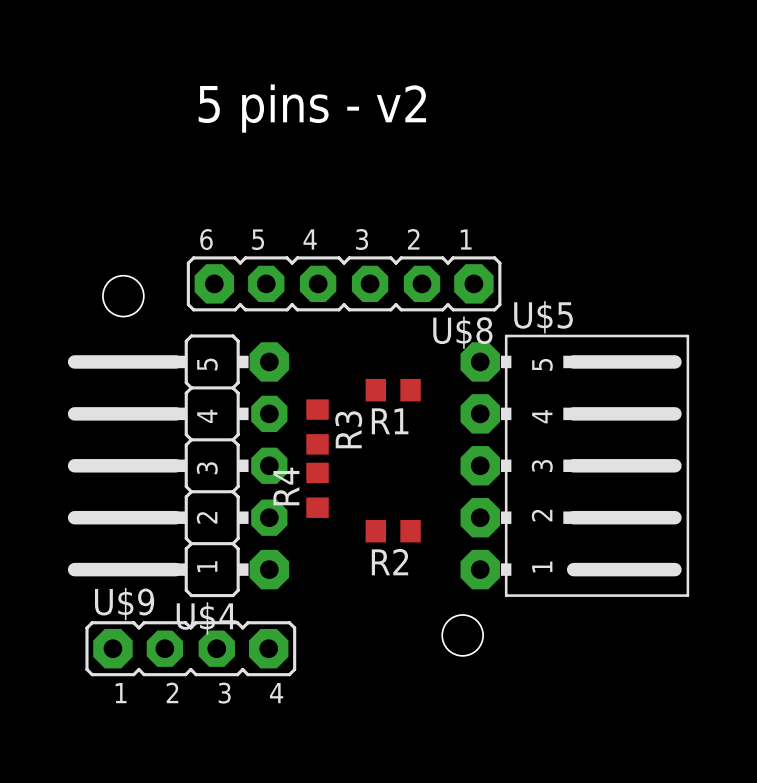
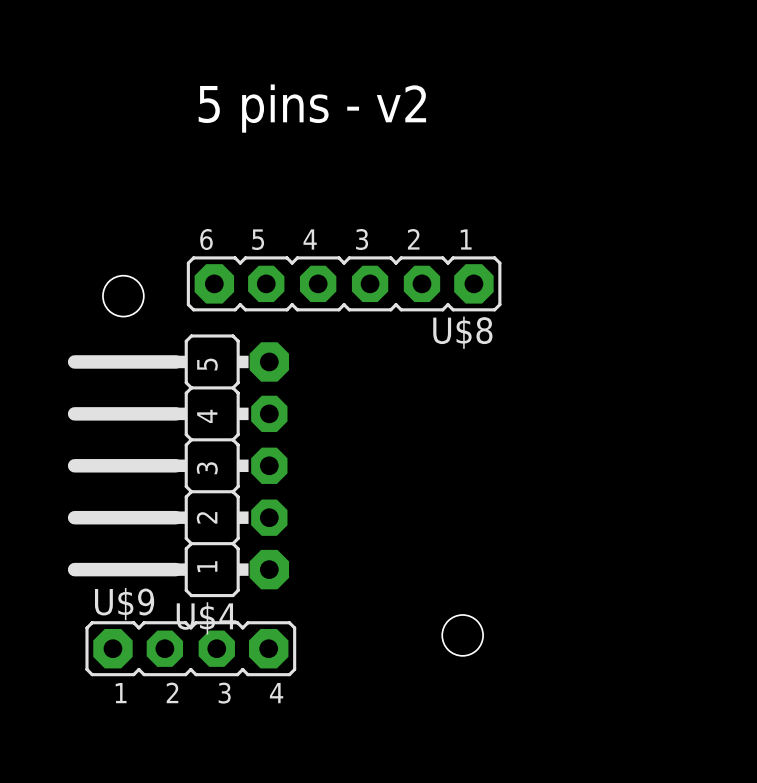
R1: (393, 390) -> none
R3: (317, 426) -> none
U$5: (574, 465) -> none
R4: (317, 490) -> none
R2: (393, 531) -> none

